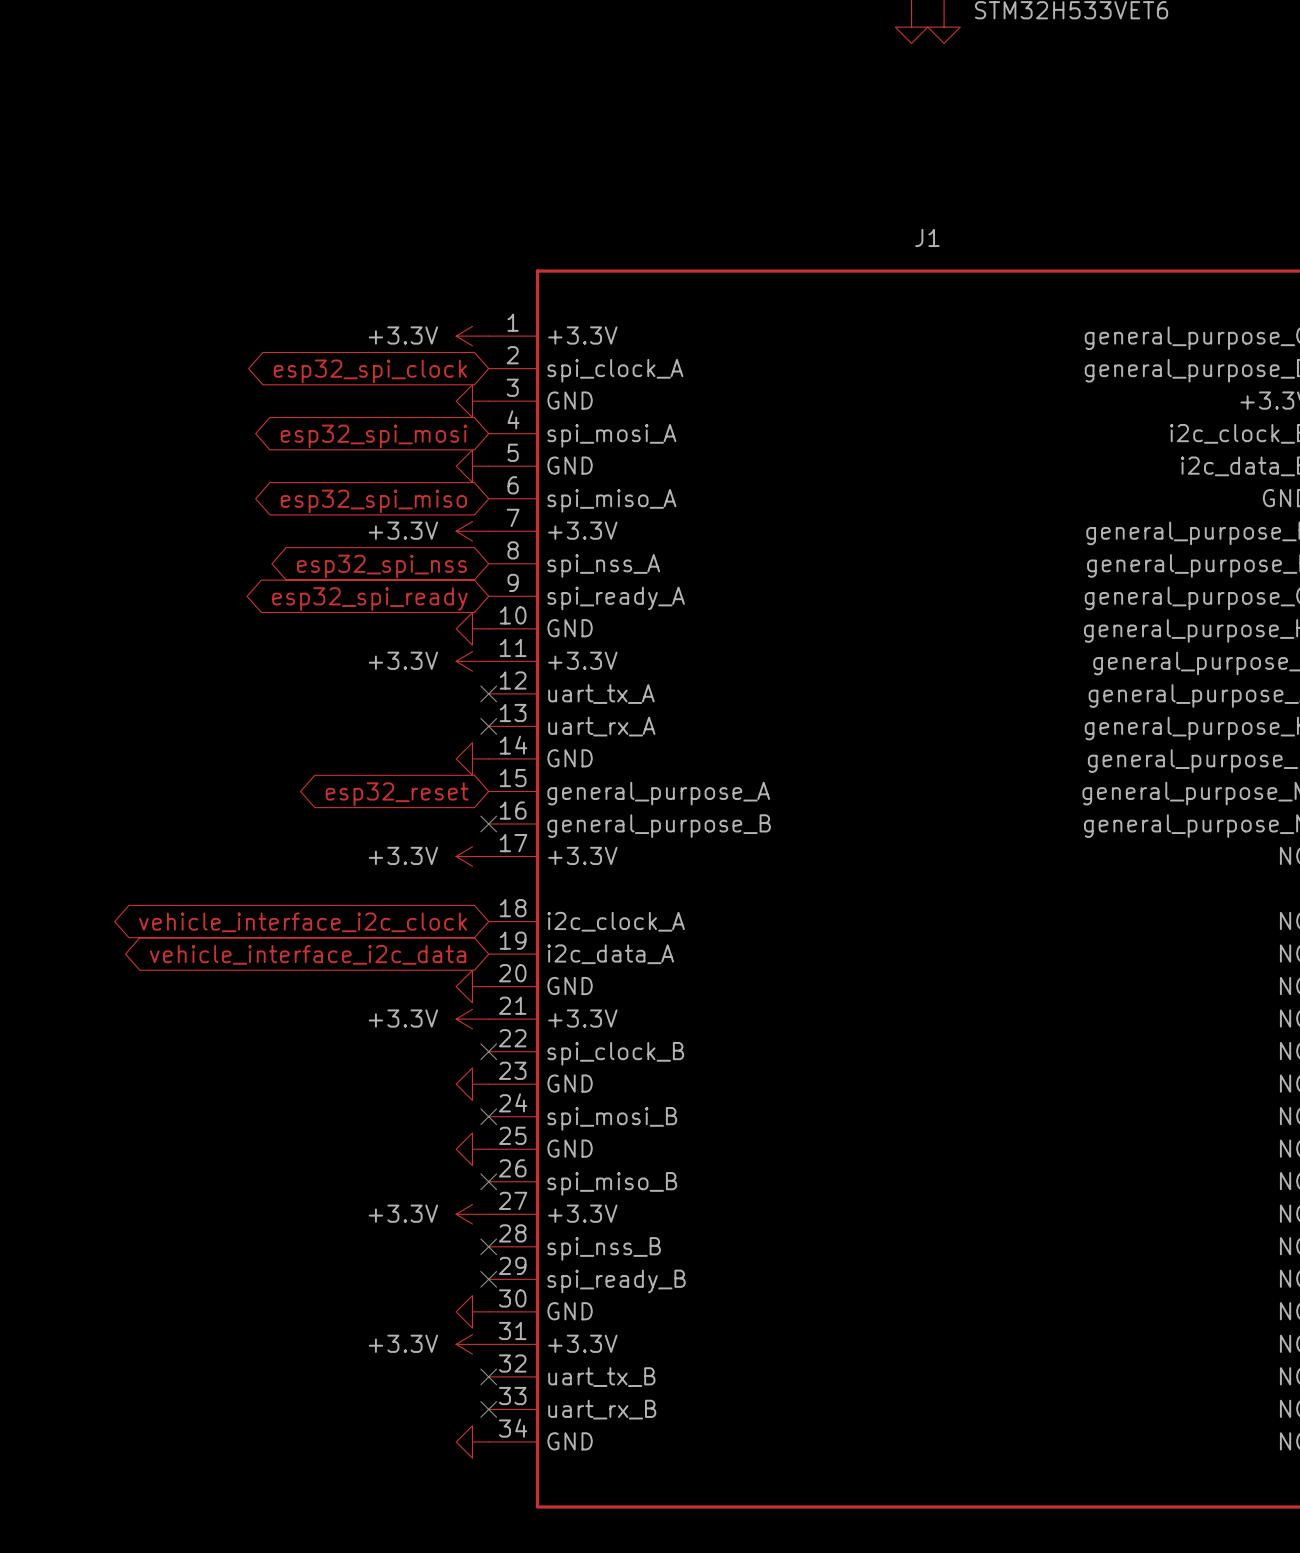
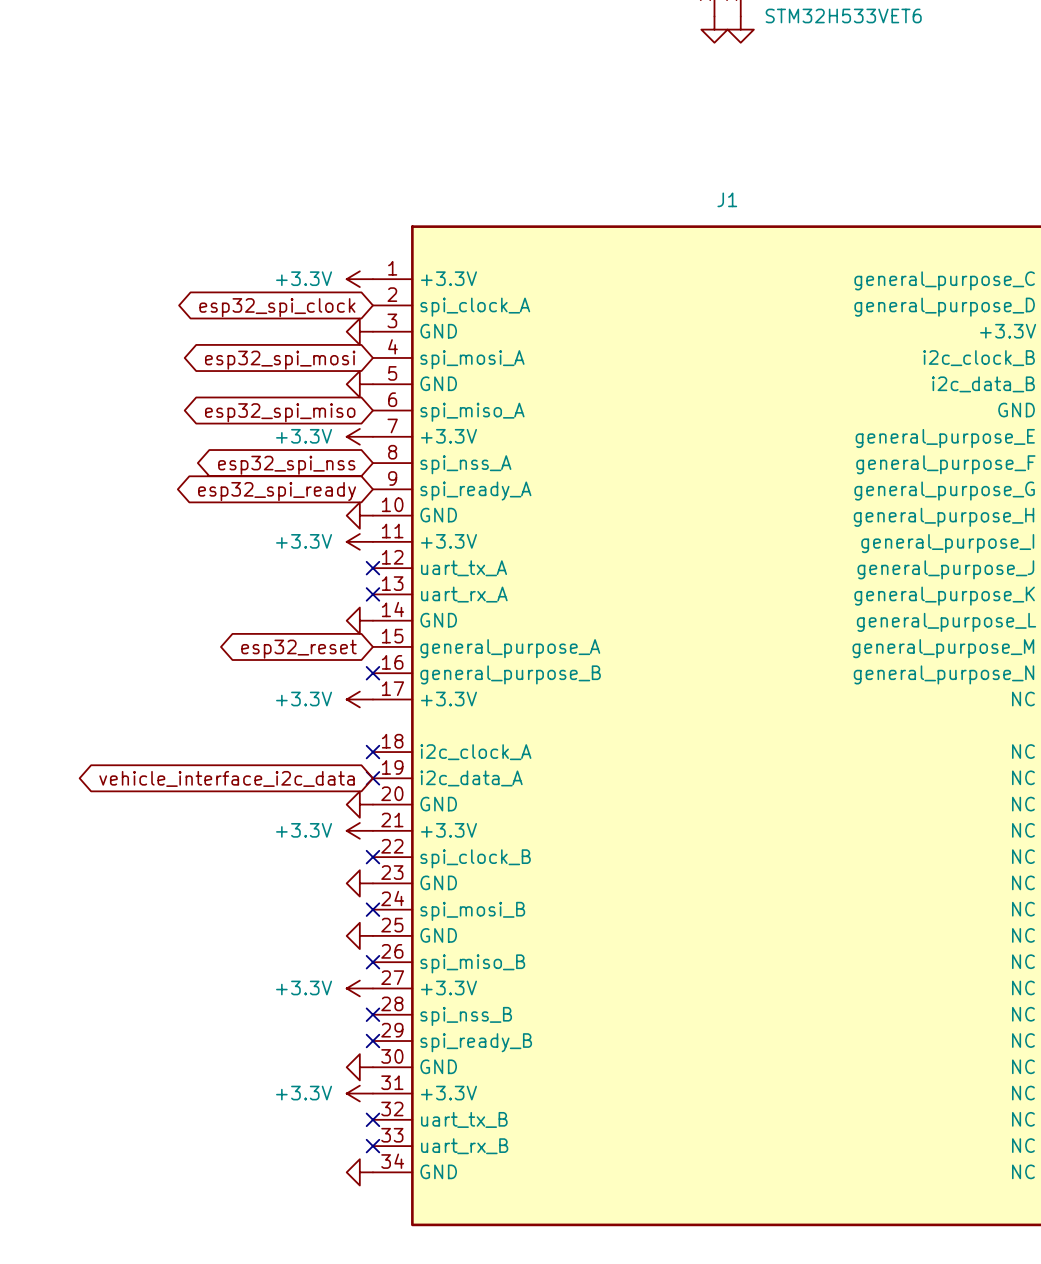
no-connect mark: none -> (372, 752)
global label: vehicle_interface_i2c_clock (303, 922) -> none
no-connect mark: none -> (372, 778)

